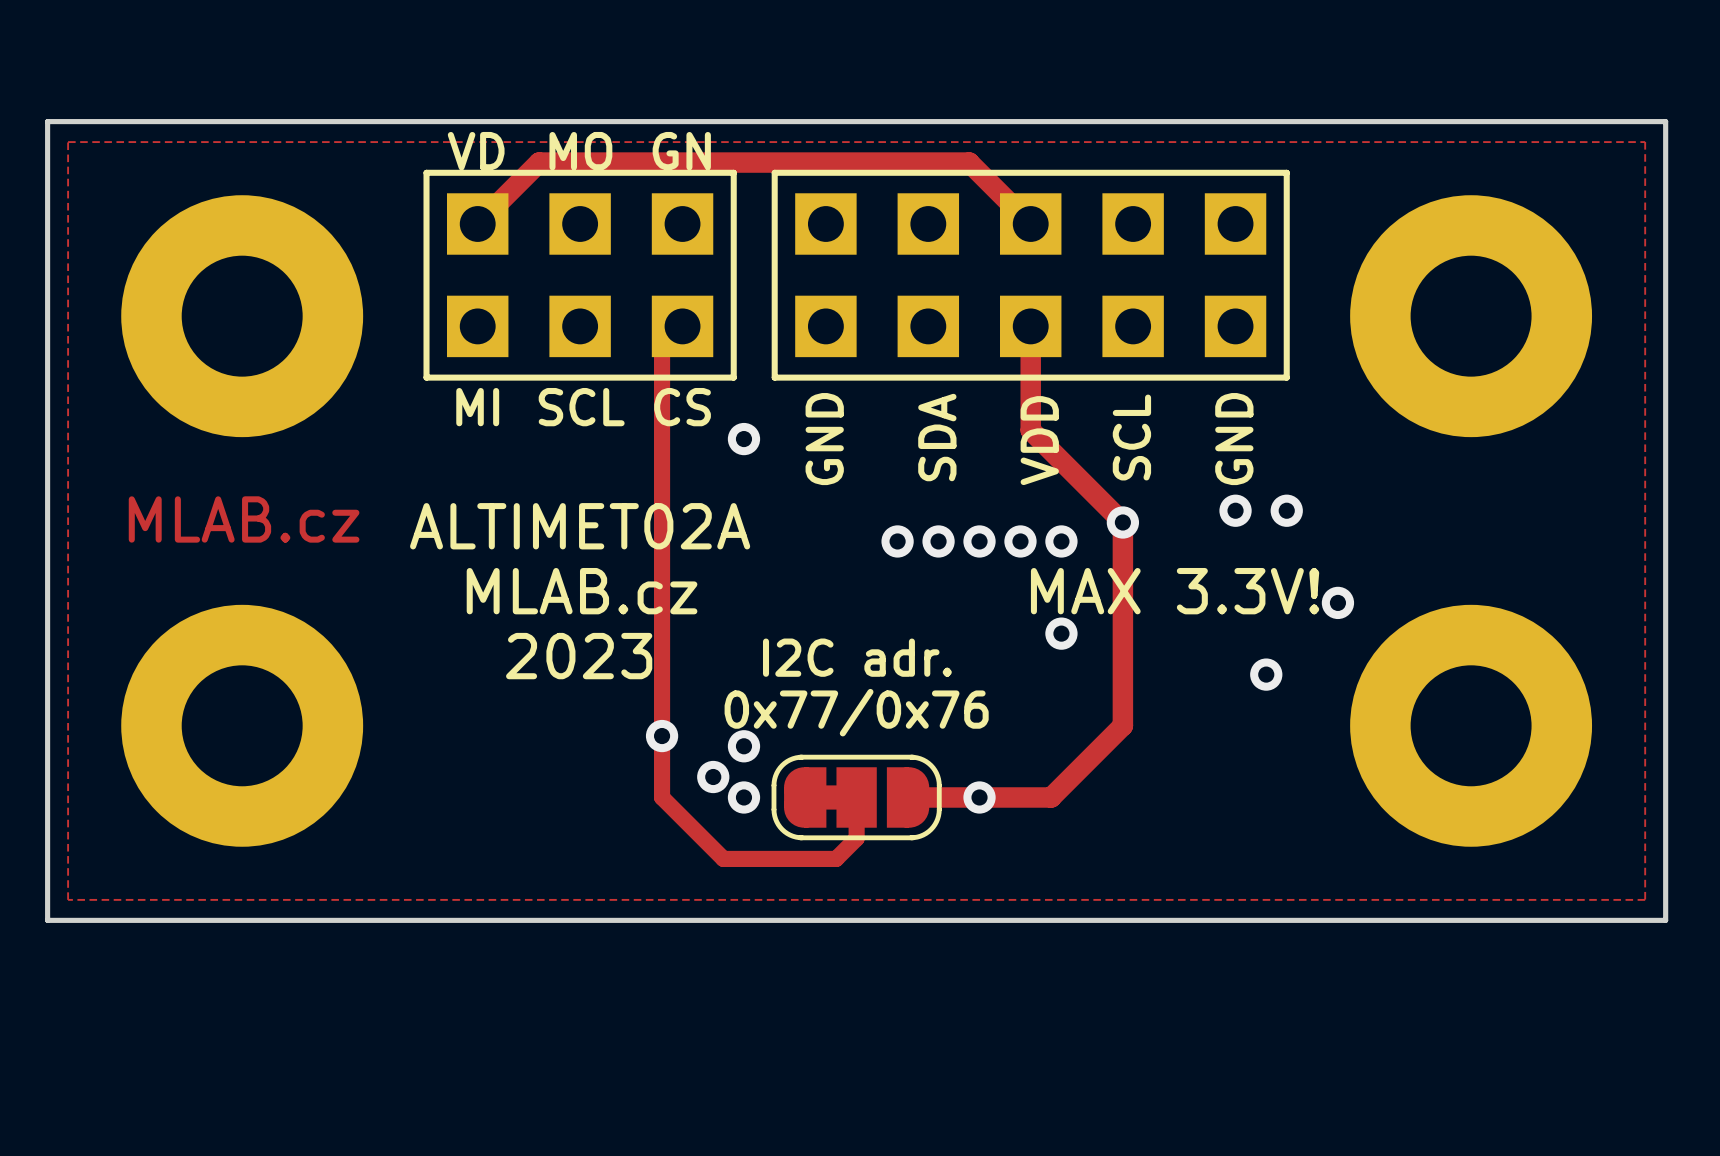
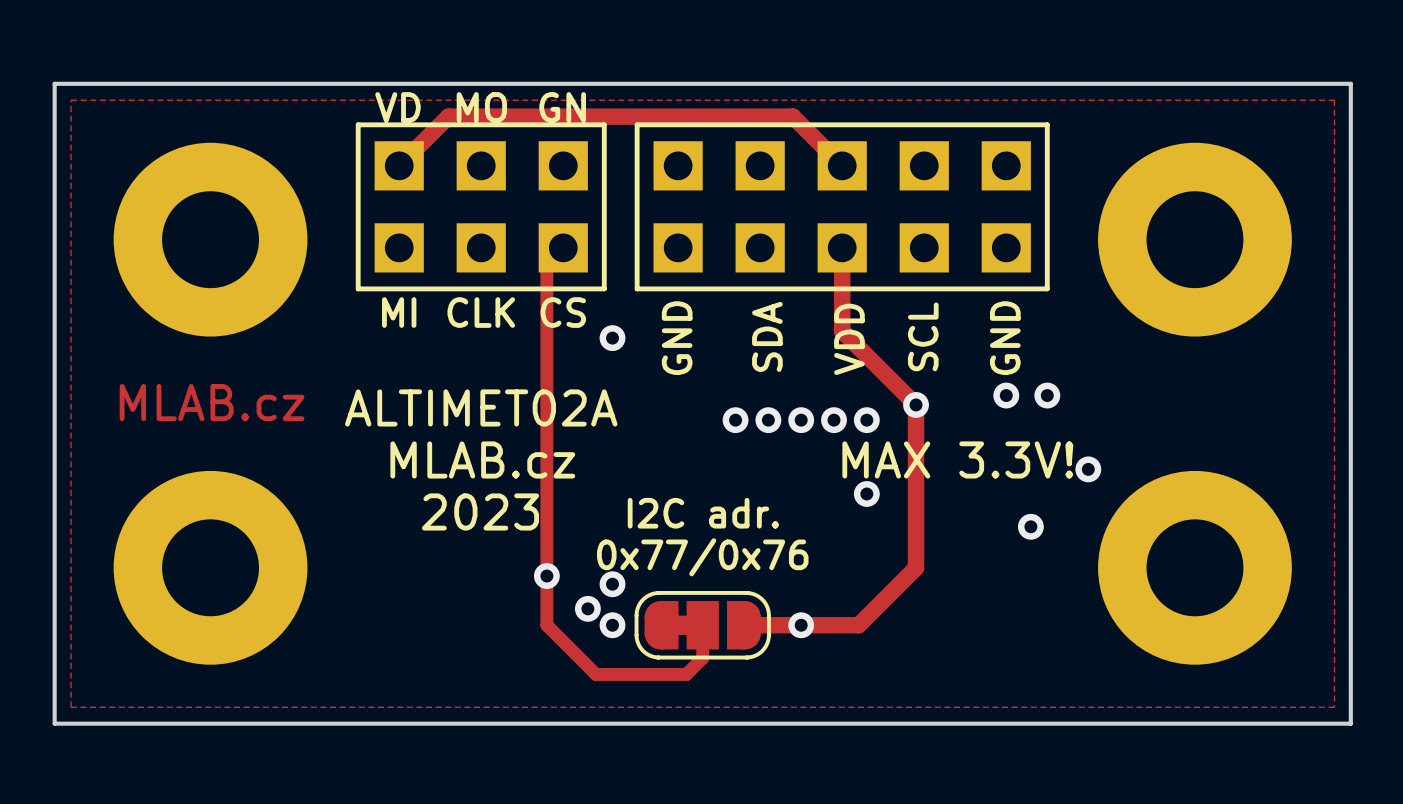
text: SCL (581, 407) -> CLK (481, 312)

